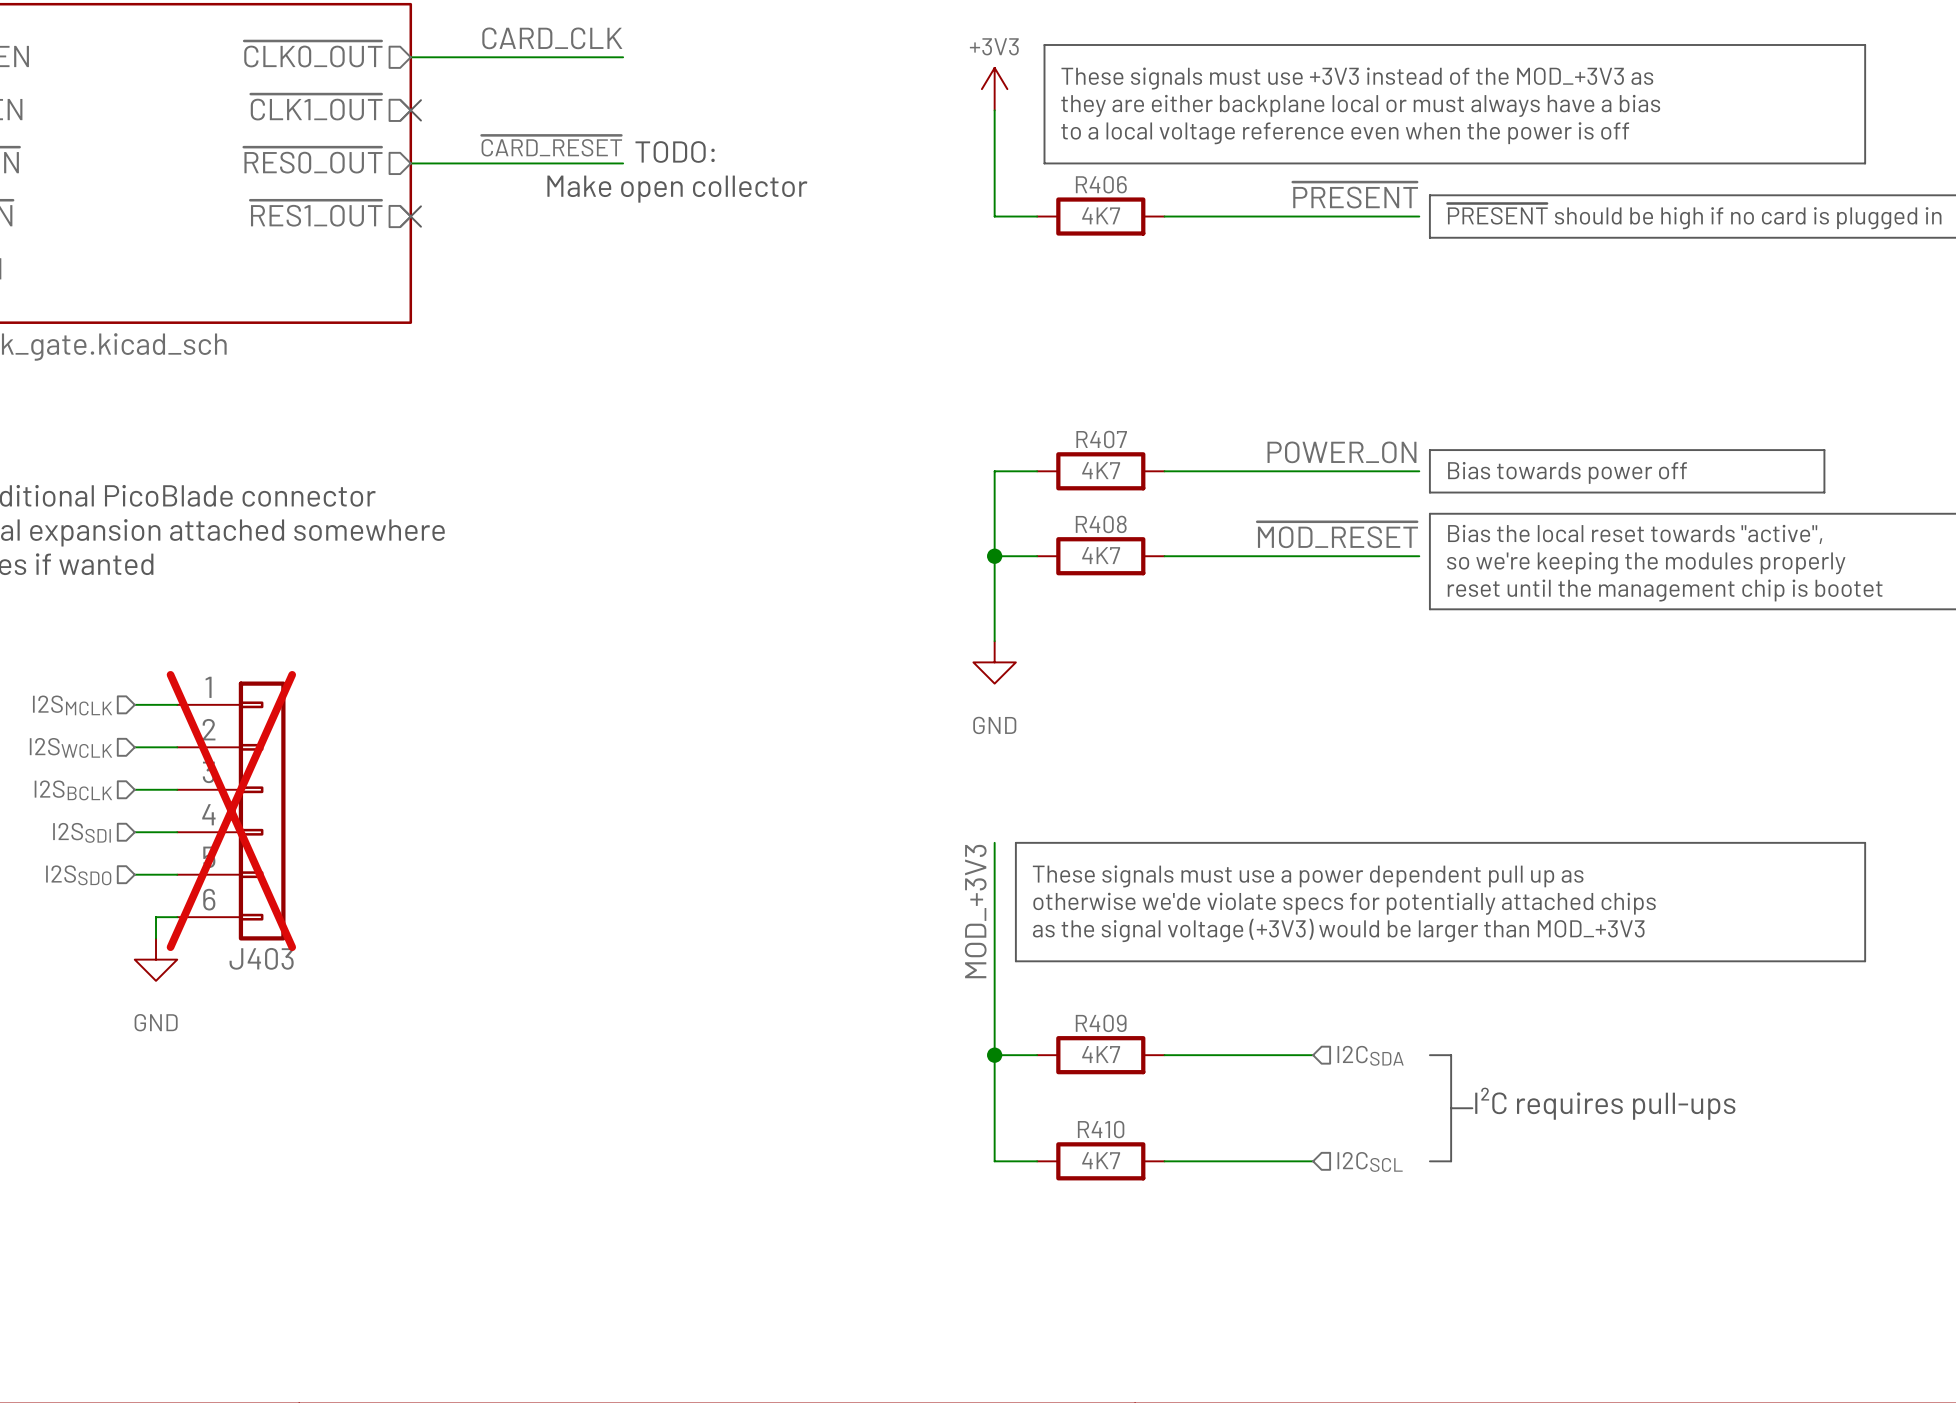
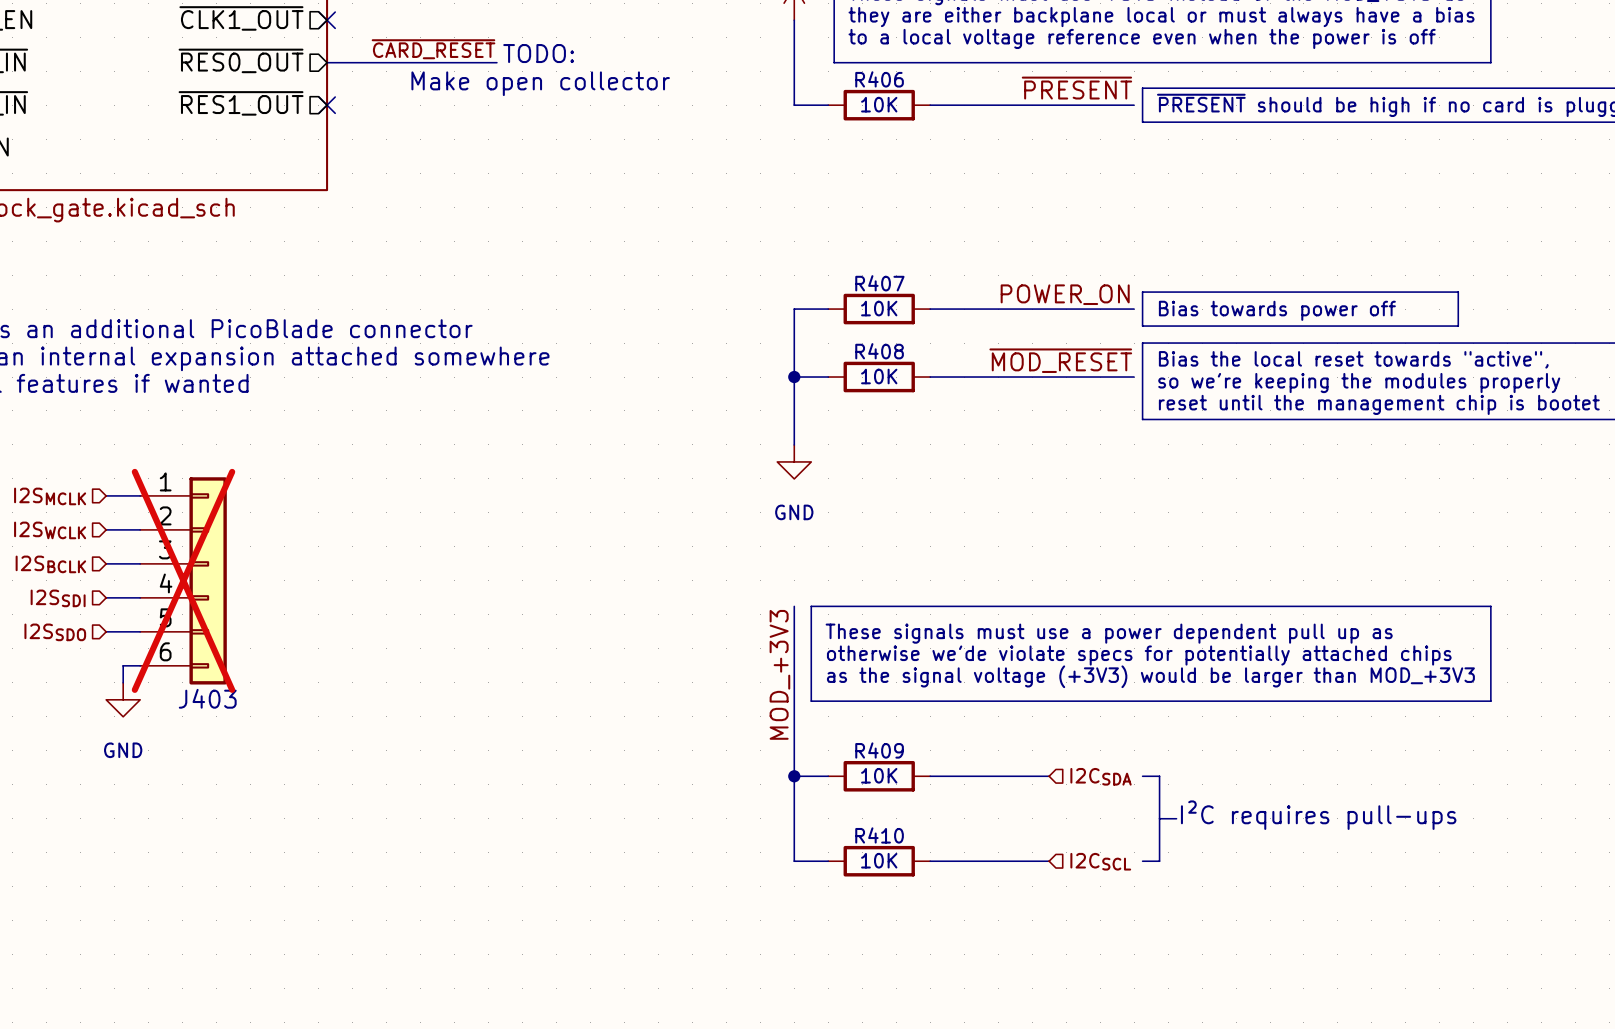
R406 value: 4K7 (1101, 215) -> 10K (879, 104)
R407 value: 4K7 (1101, 470) -> 10K (879, 308)
R408 value: 4K7 (1101, 555) -> 10K (879, 376)
R409 value: 4K7 (1101, 1054) -> 10K (879, 775)
R410 value: 4K7 (1101, 1160) -> 10K (879, 860)

